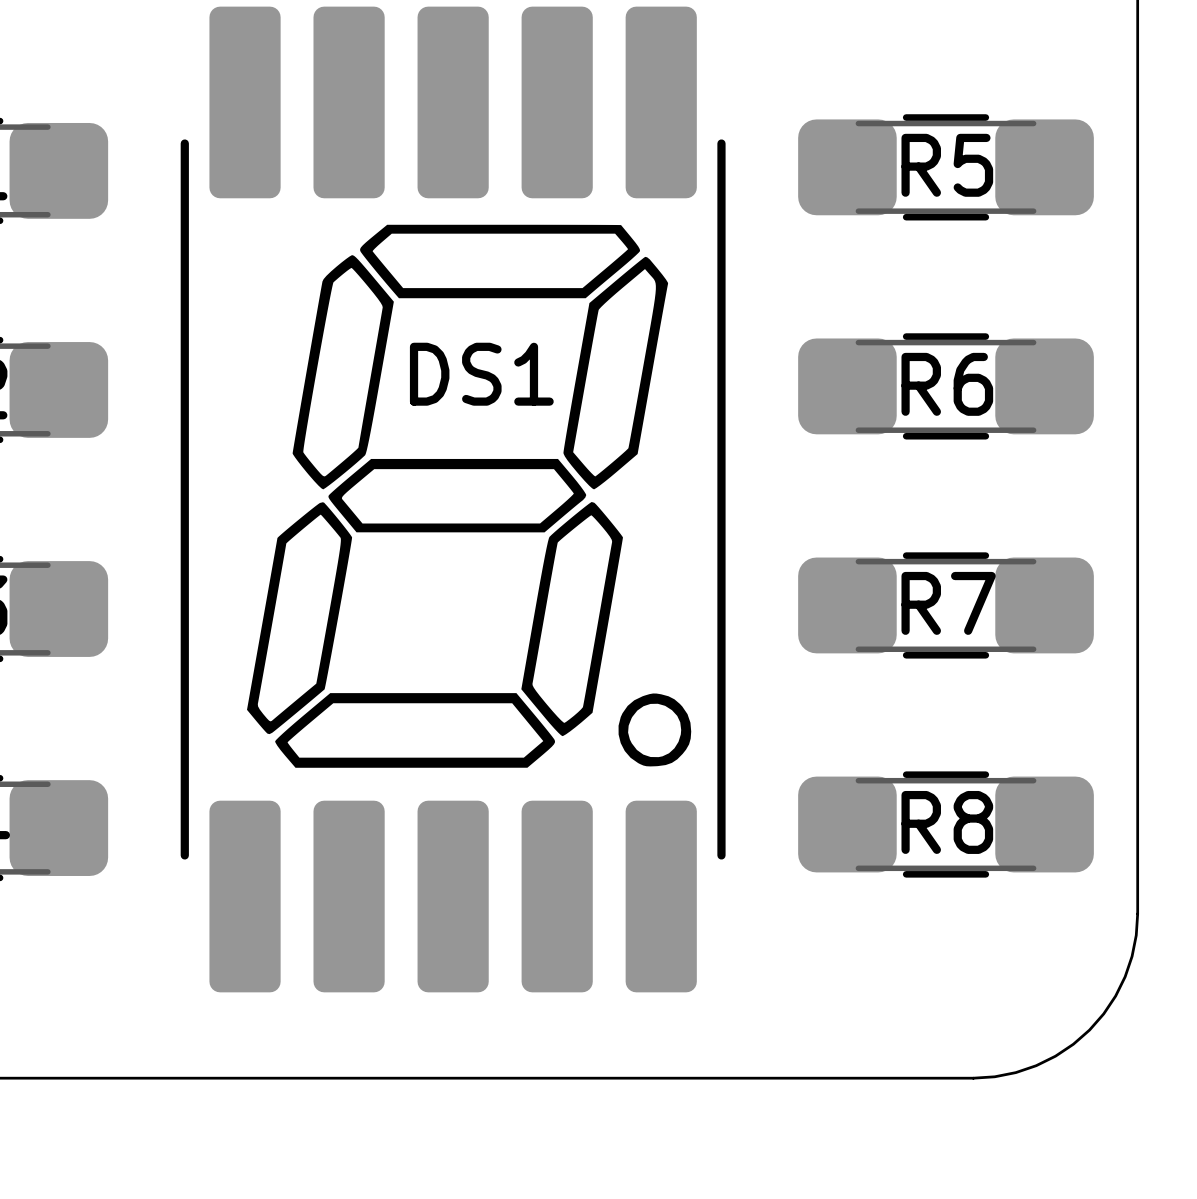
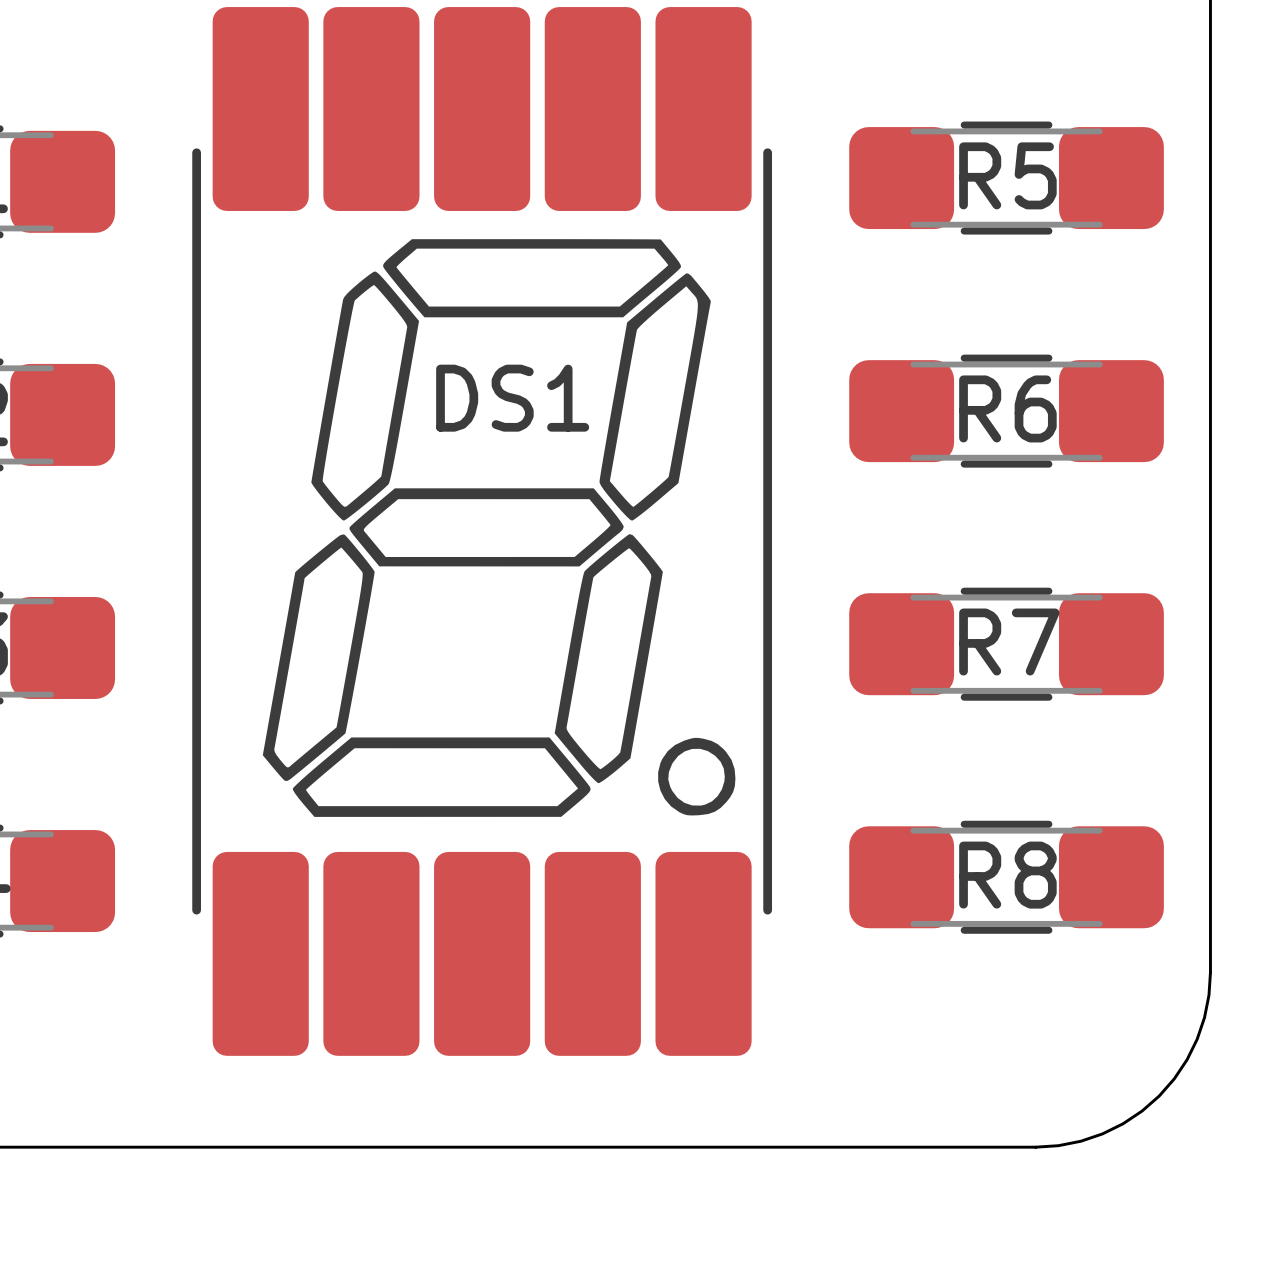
DS1 footprint: [180, 6, 726, 993] -> [192, 7, 773, 1056]

